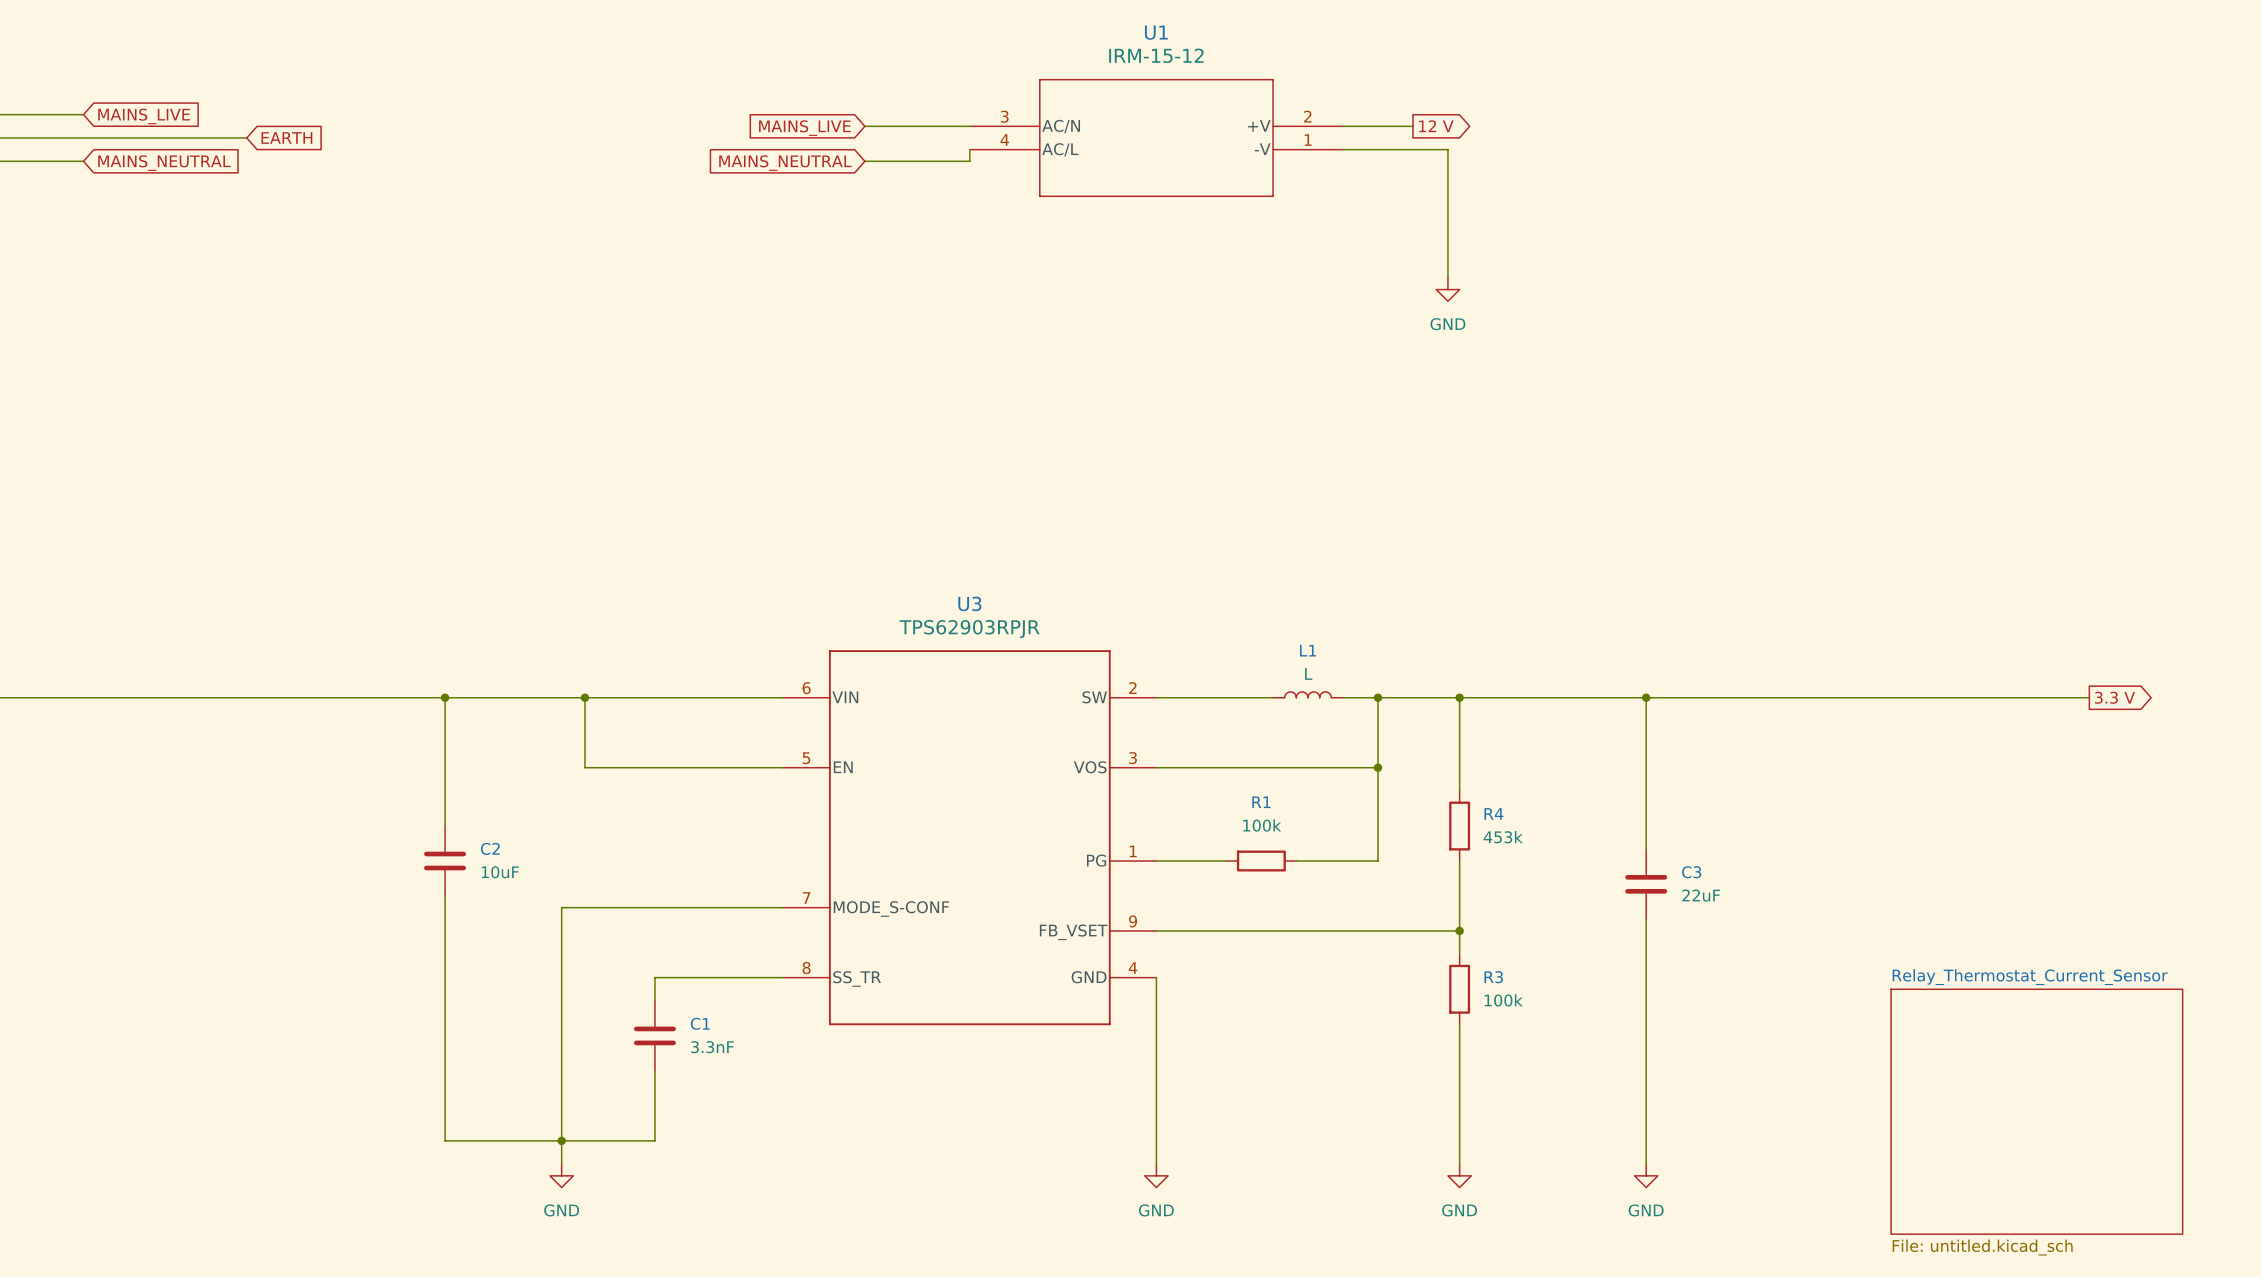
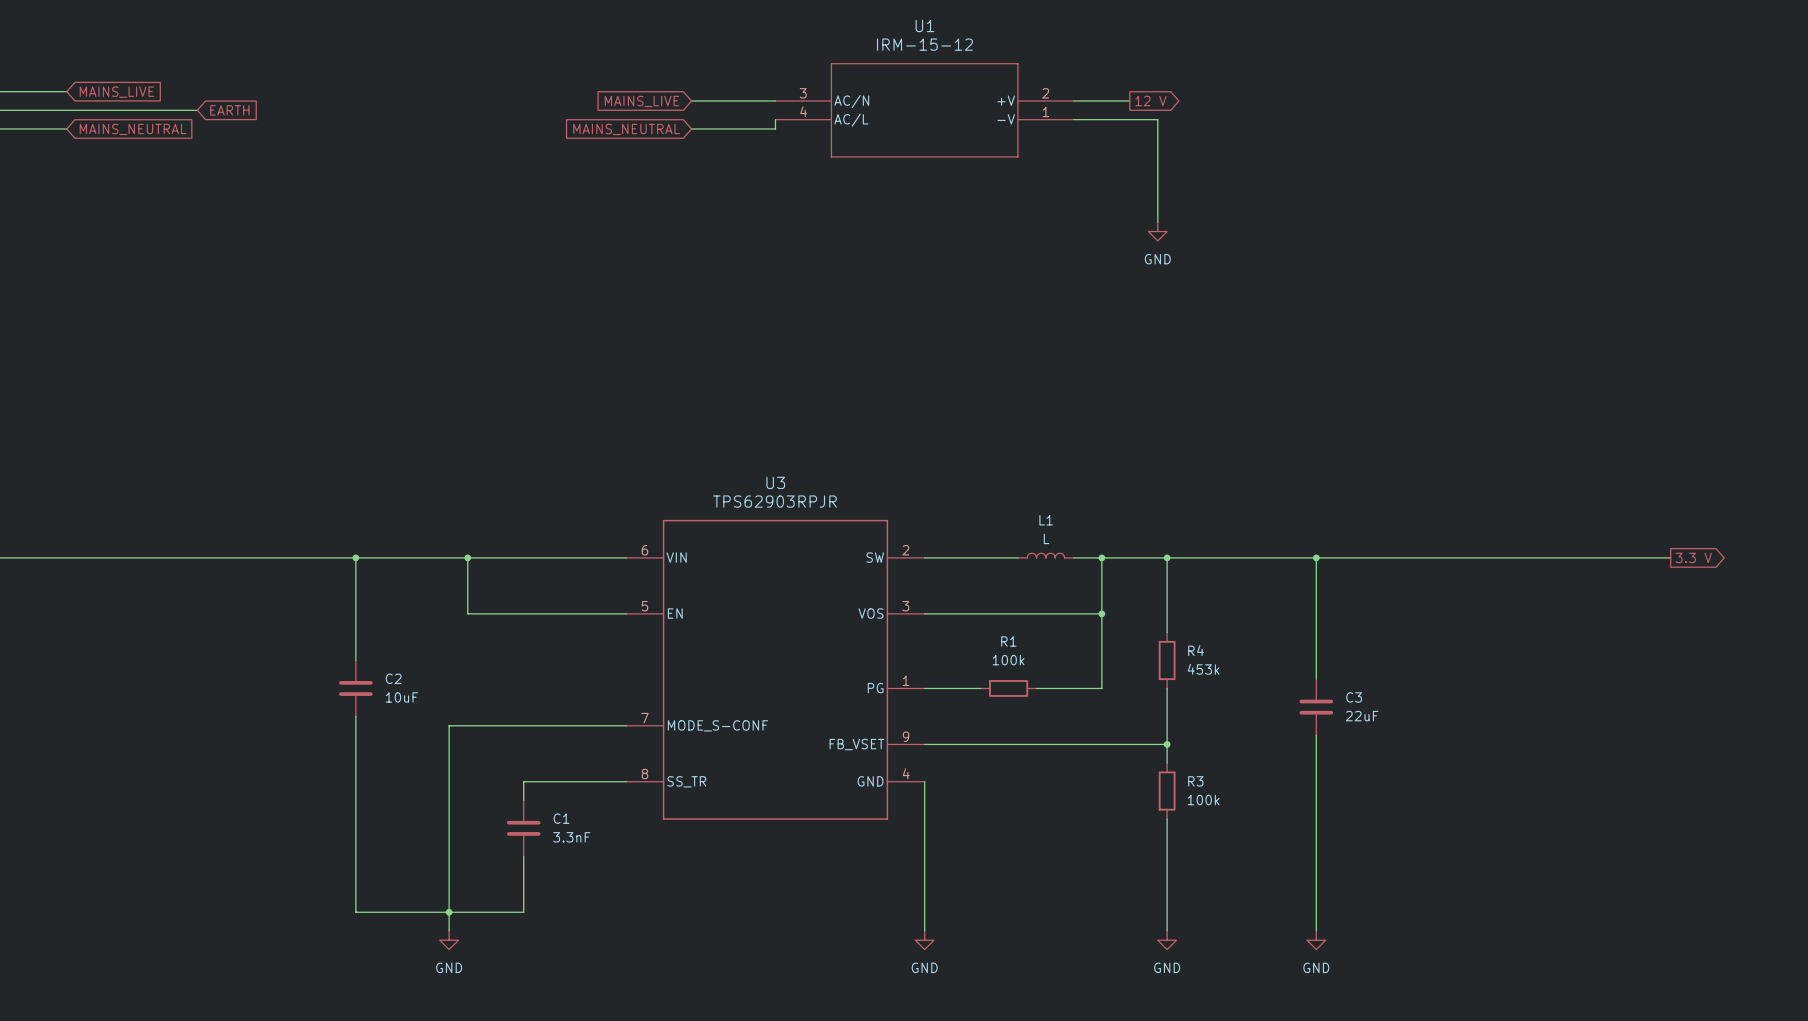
sheet Relay_Thermostat_Current_Sensor: File: untitled.kicad_sch (2036, 1111) -> none

